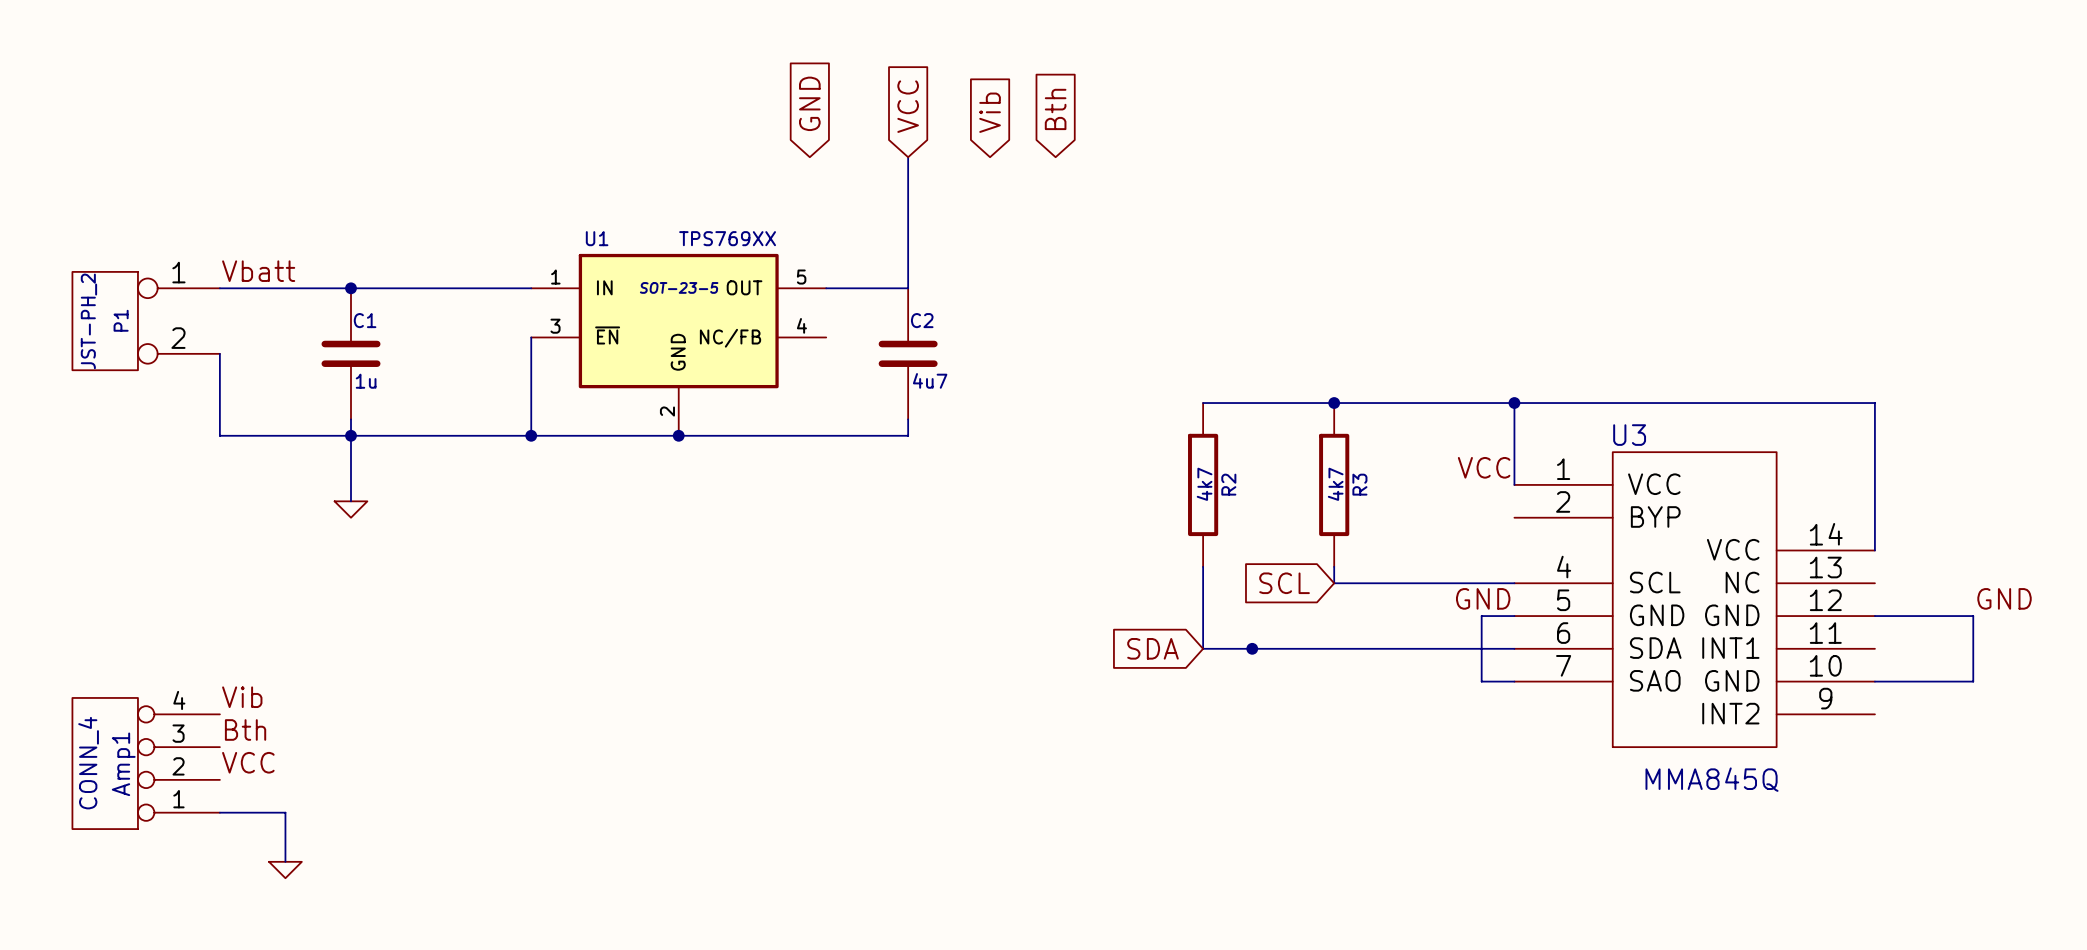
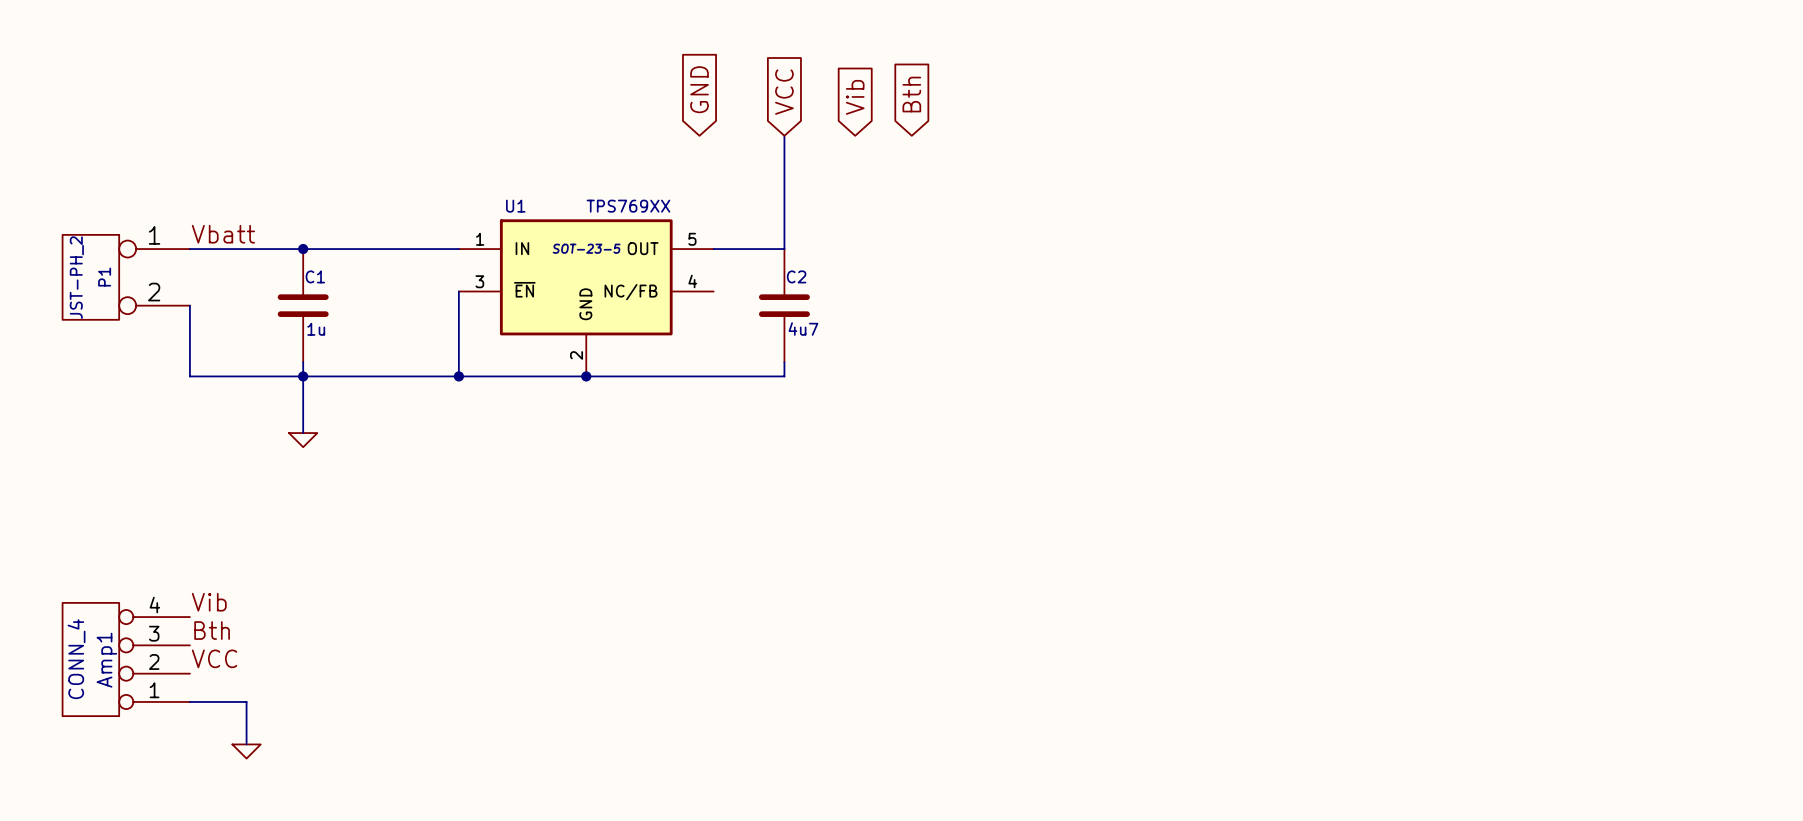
wire: (1203, 403) (1874, 403) (1874, 550) -> none
junction: (1334, 403) -> none
wire: (1514, 403) (1514, 484) -> none
junction: (1514, 403) -> none
label: VCC (1484, 467) -> none
R2: 4k7 (1203, 484) -> none
R3: 4k7 (1334, 484) -> none
wire: (1203, 566) (1203, 648) (1514, 648) -> none
wire: (1334, 566) (1334, 583) (1514, 583) -> none
global label: SCL (1284, 583) -> none
label: GND (1483, 598) -> none
label: GND (2004, 598) -> none
U3: MMA845Q (1694, 599) -> none
wire: (1514, 616) (1481, 616) (1481, 681) (1514, 681) -> none
wire: (1874, 616) (1973, 616) (1973, 681) (1874, 681) -> none
global label: SDA (1152, 648) -> none
junction: (1252, 648) -> none

